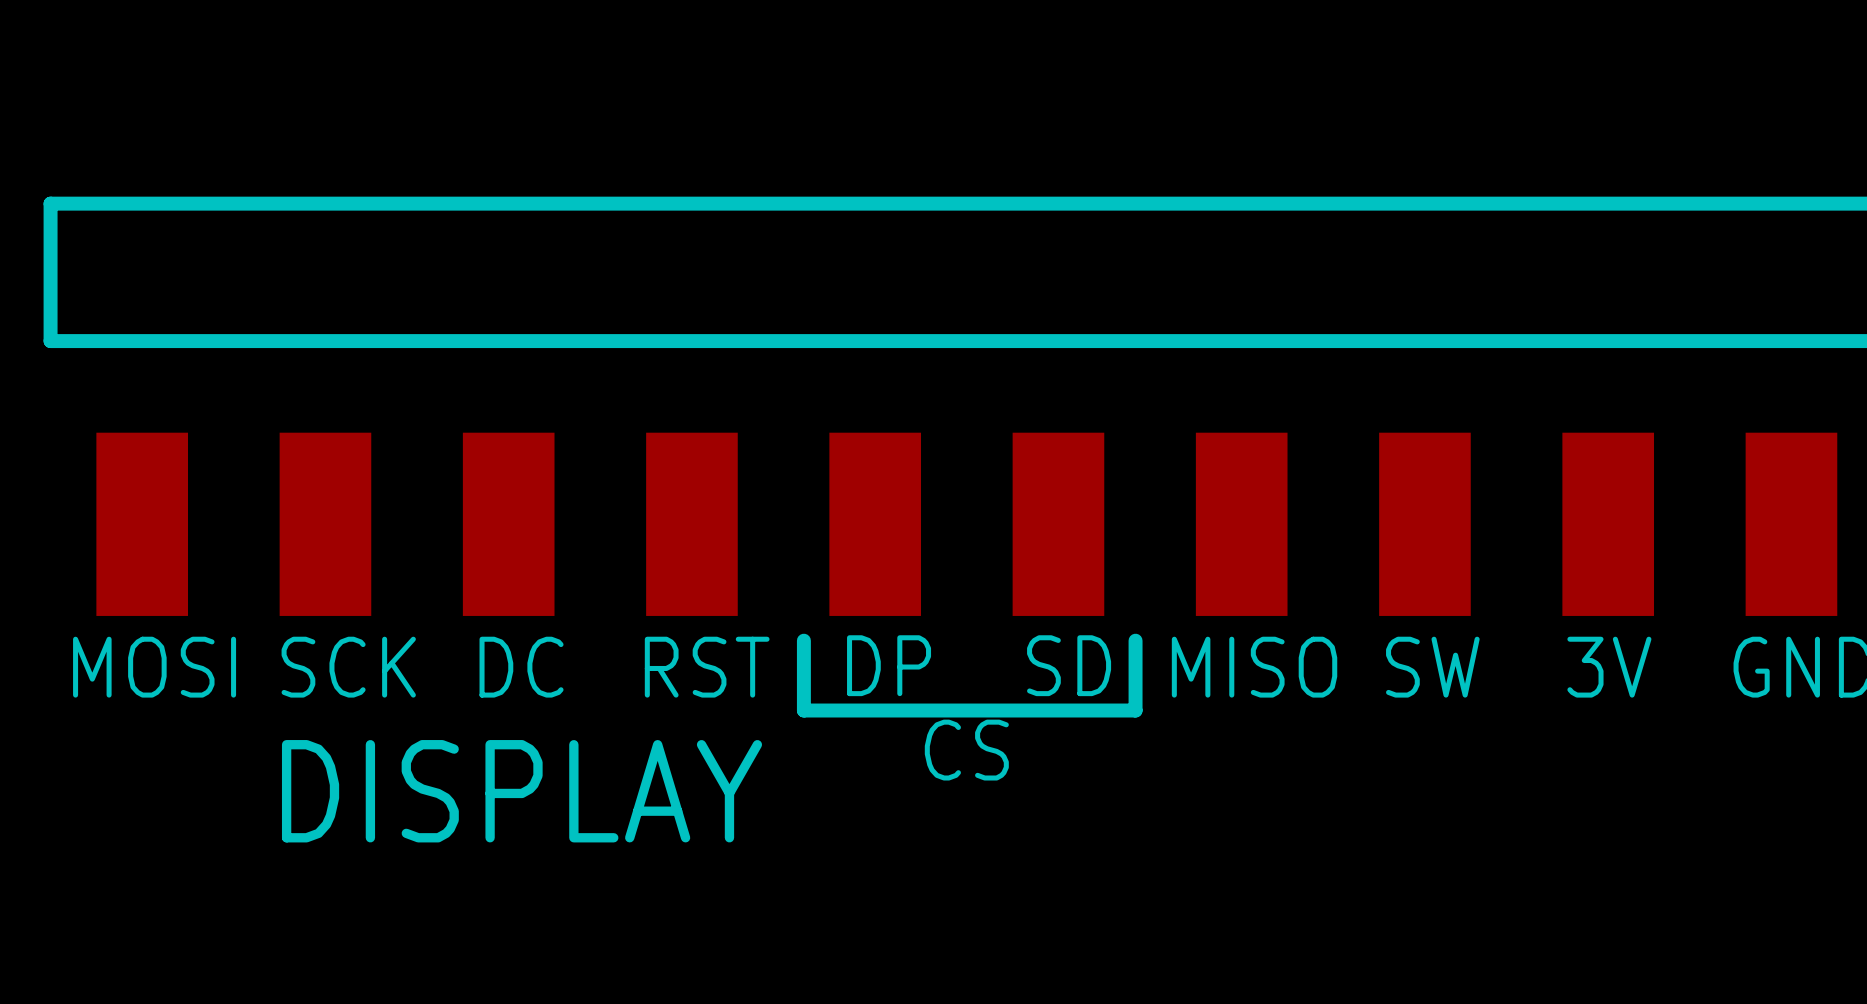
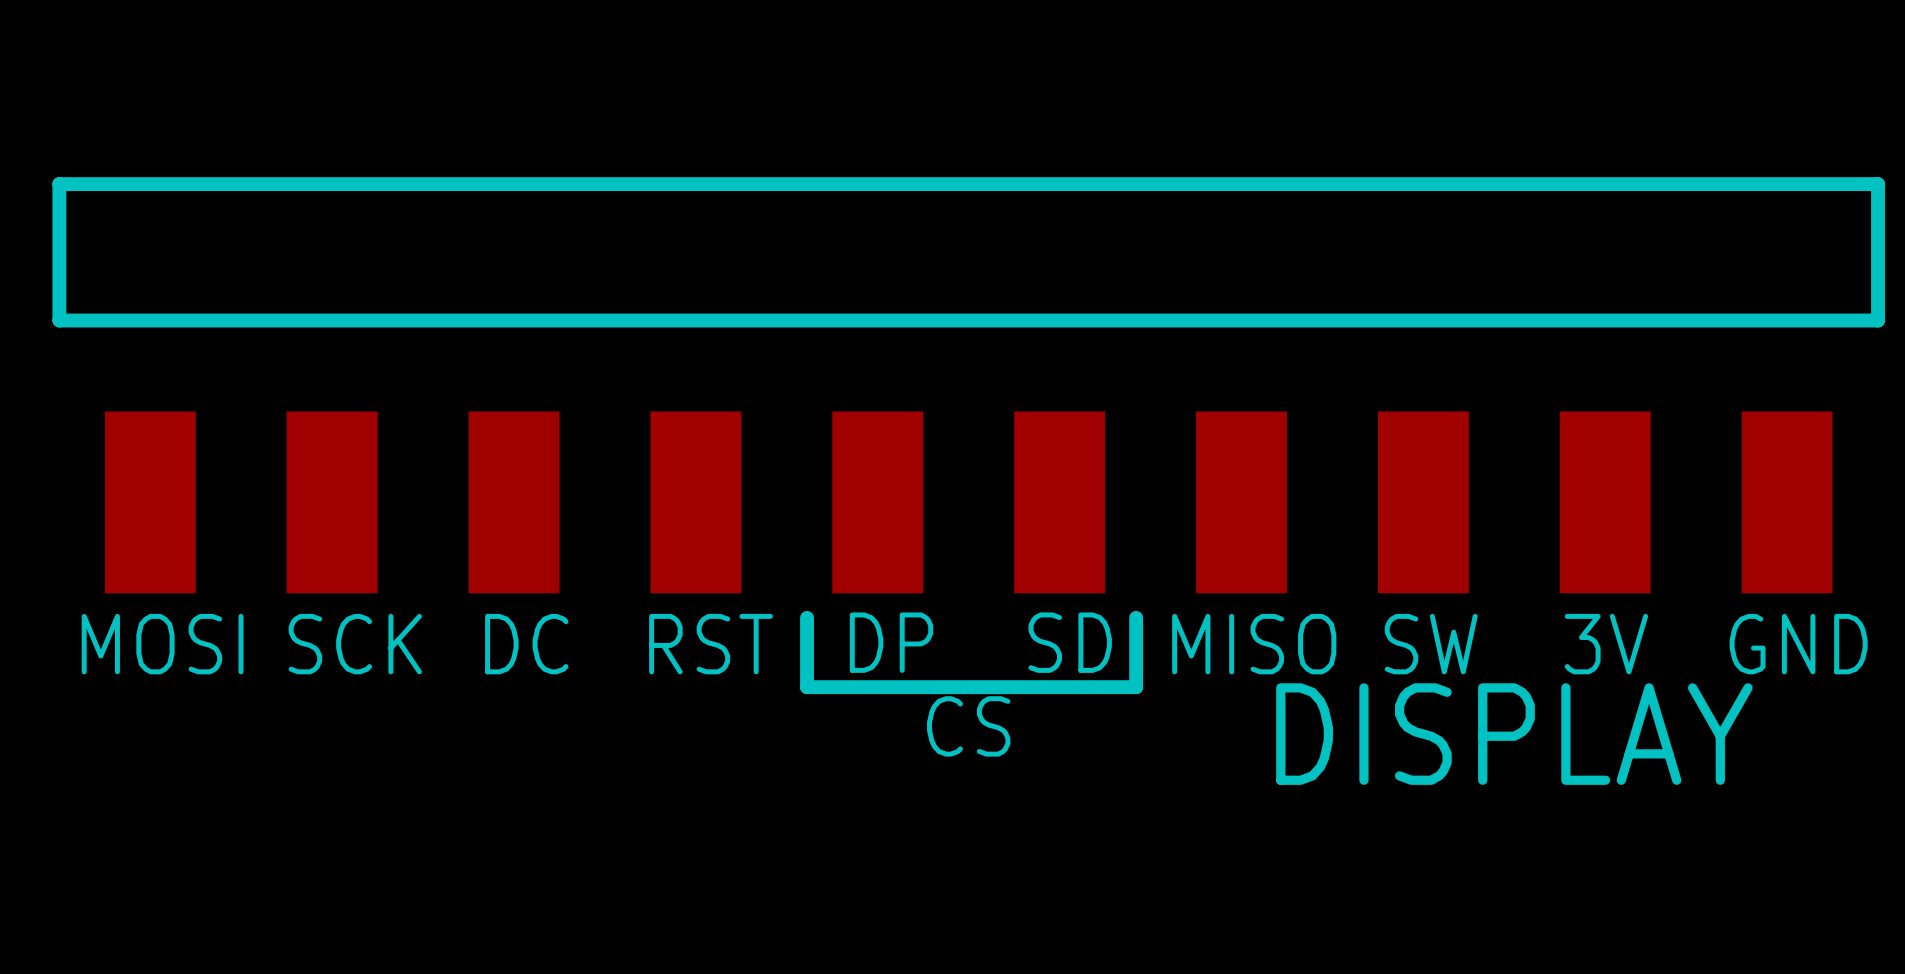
DISPLAY name position: DISPLAY (522, 791) -> DISPLAY (1514, 734)

